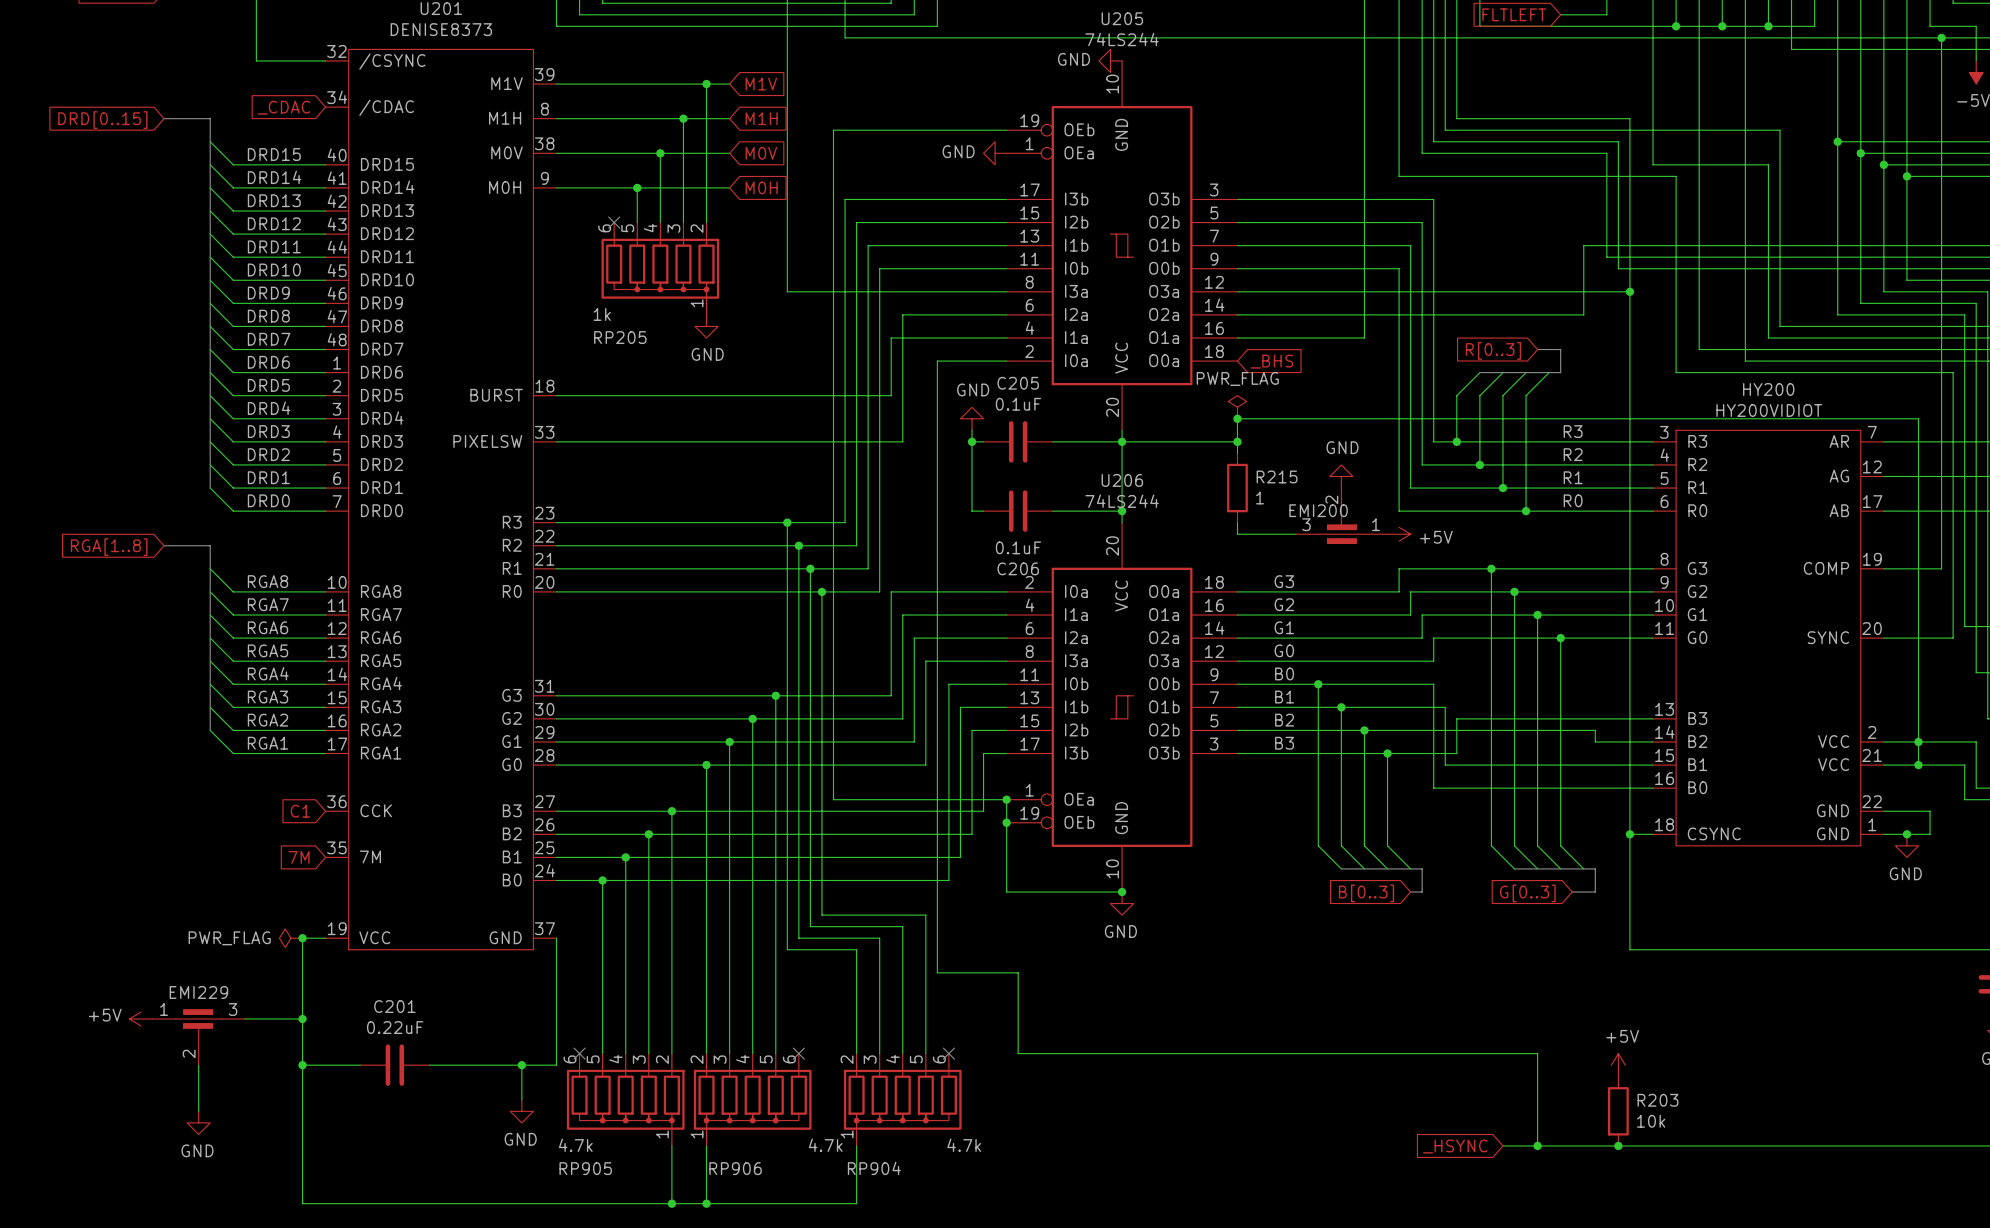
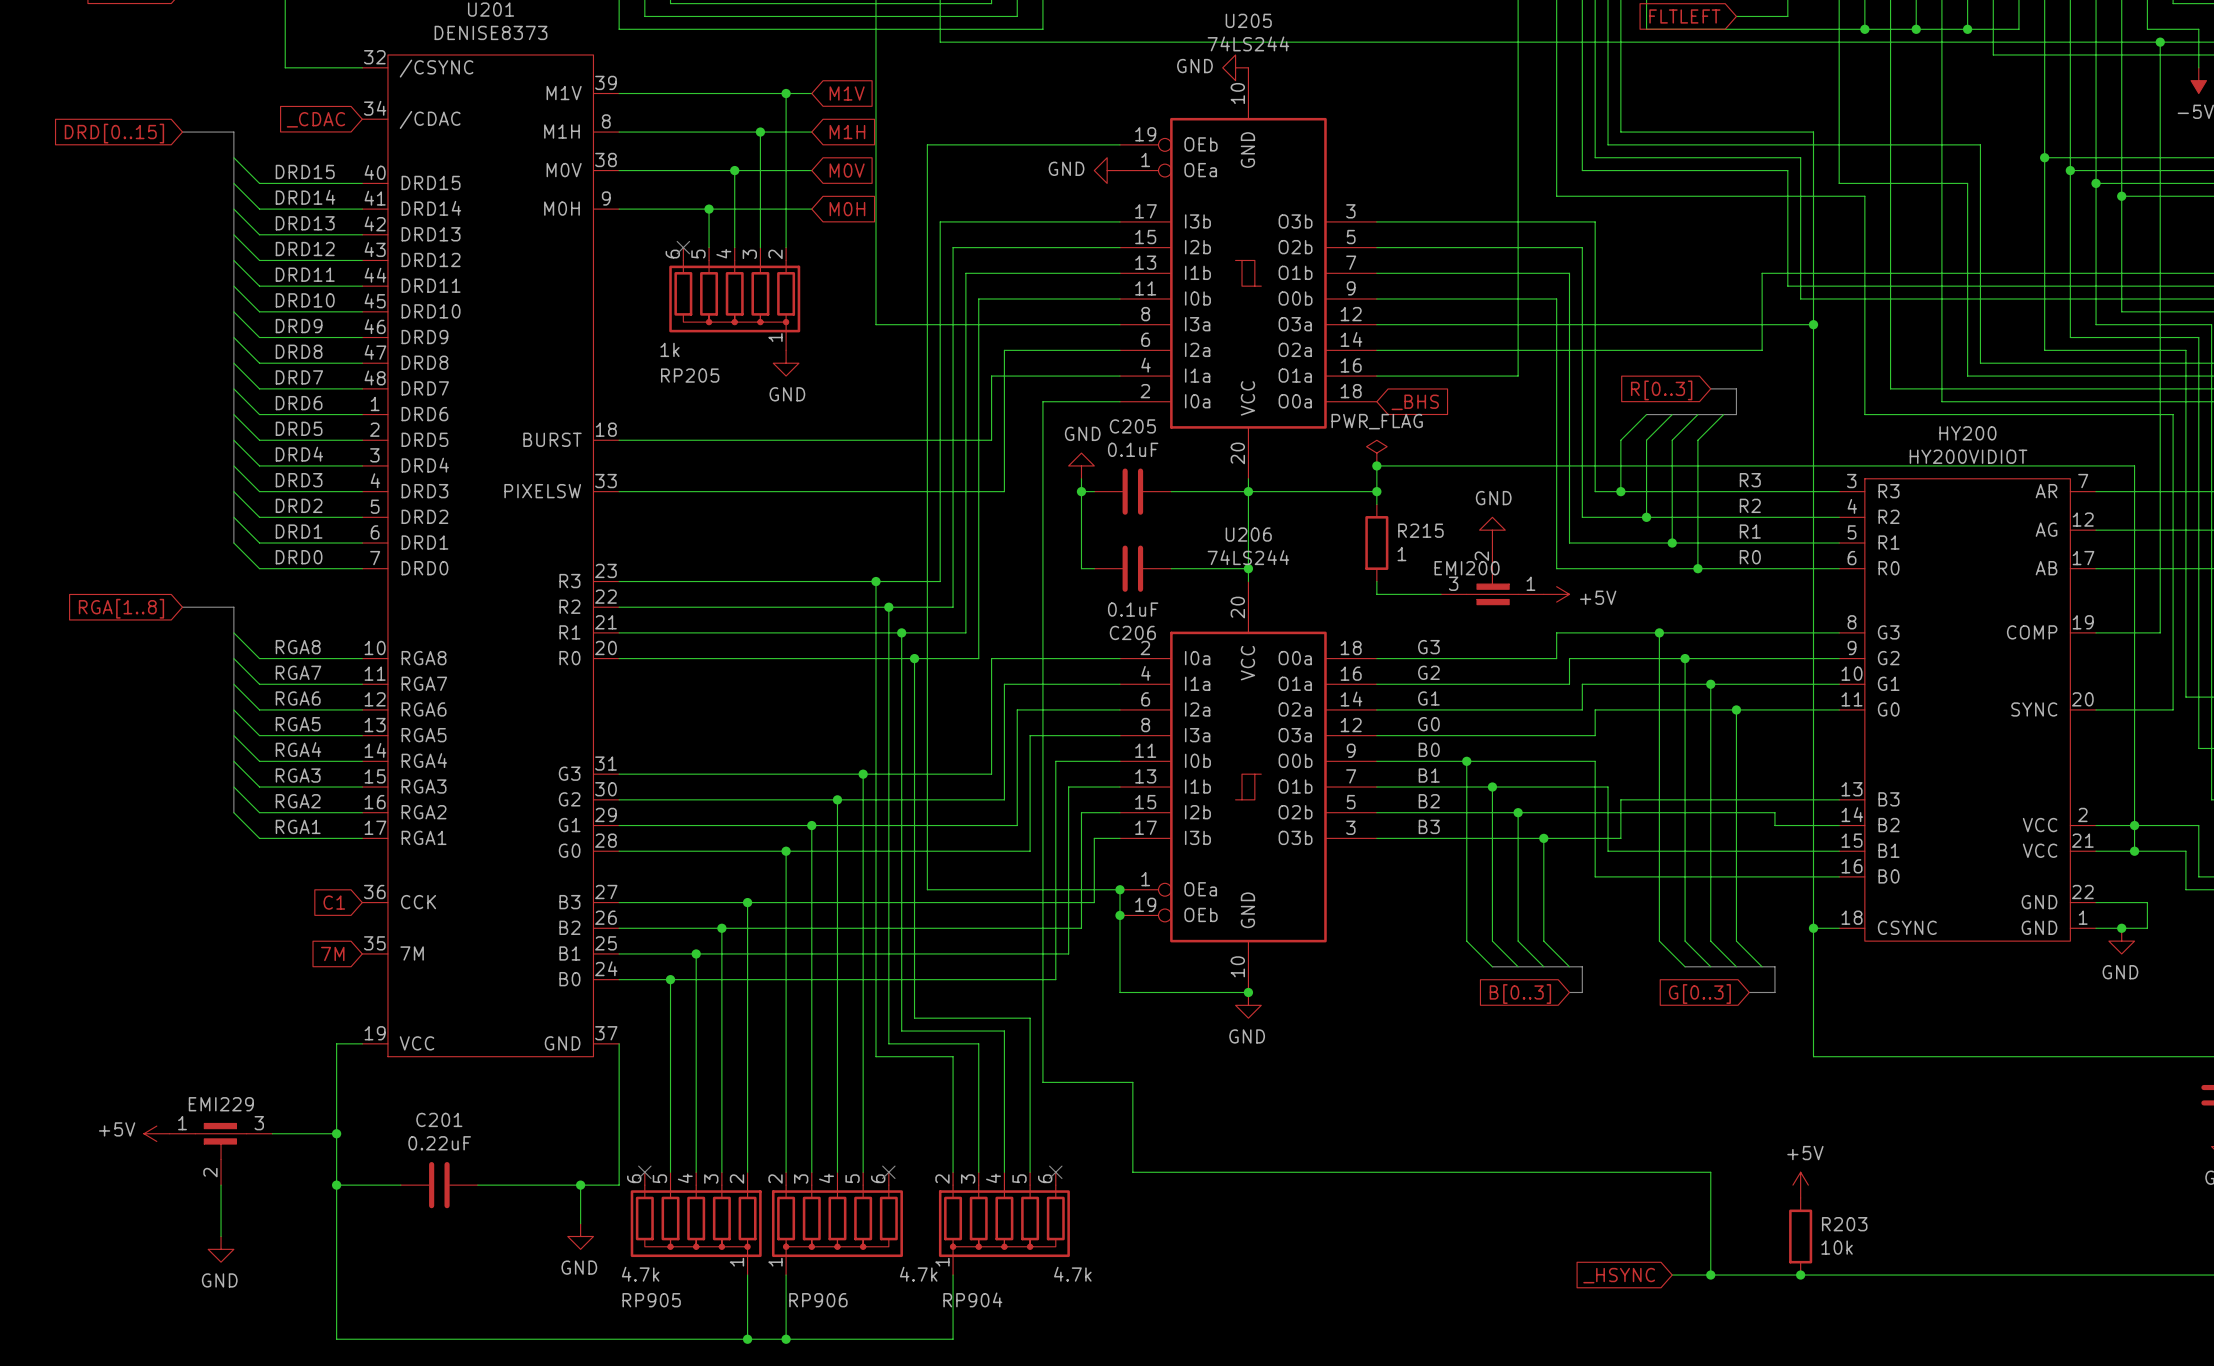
power symbol: PWR_FLAG (290, 938) -> none
junction: (302, 938) -> none

